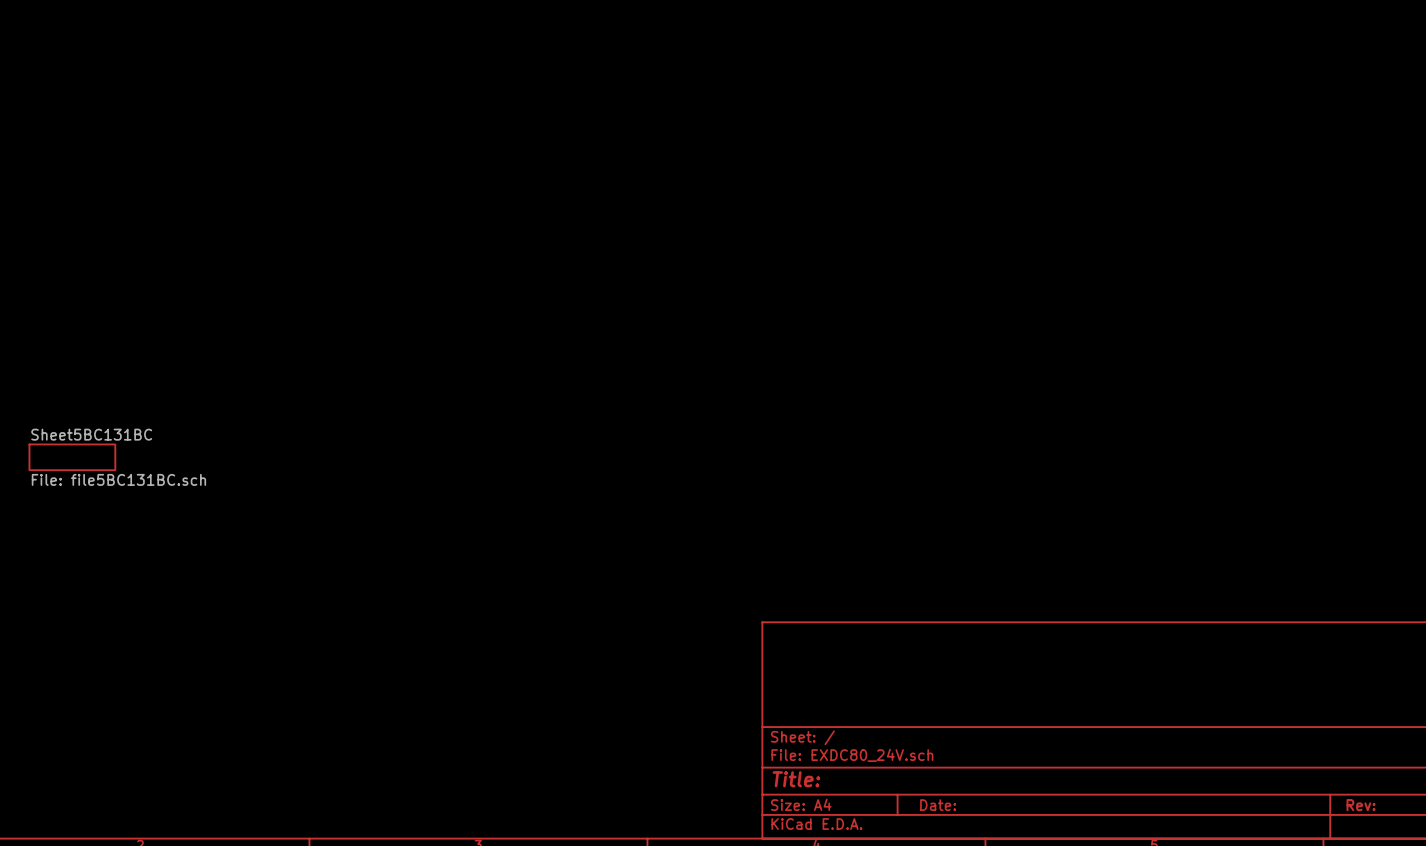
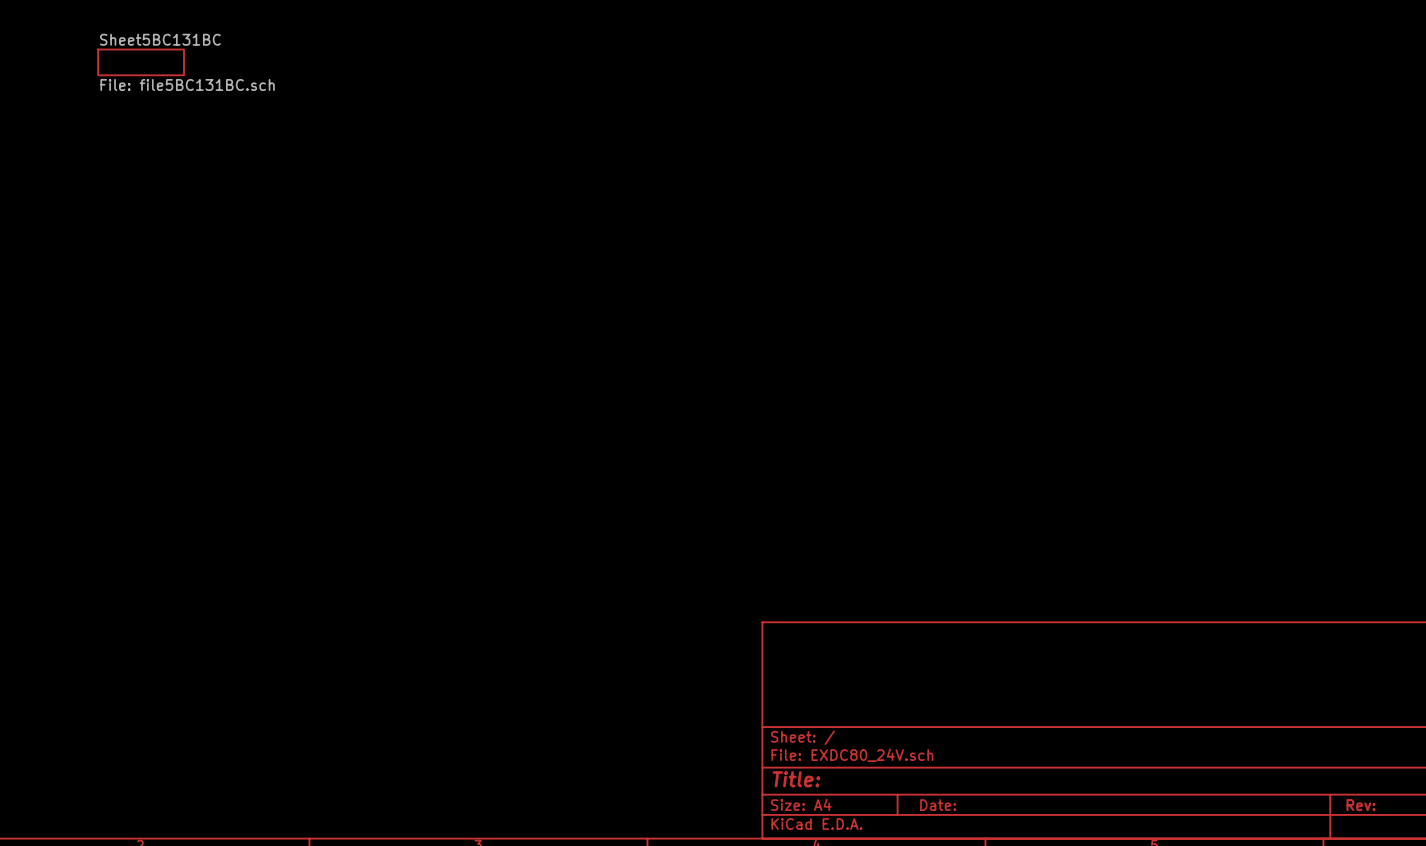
sheet Sheet5BC131BC position: (72, 457) -> (141, 62)

